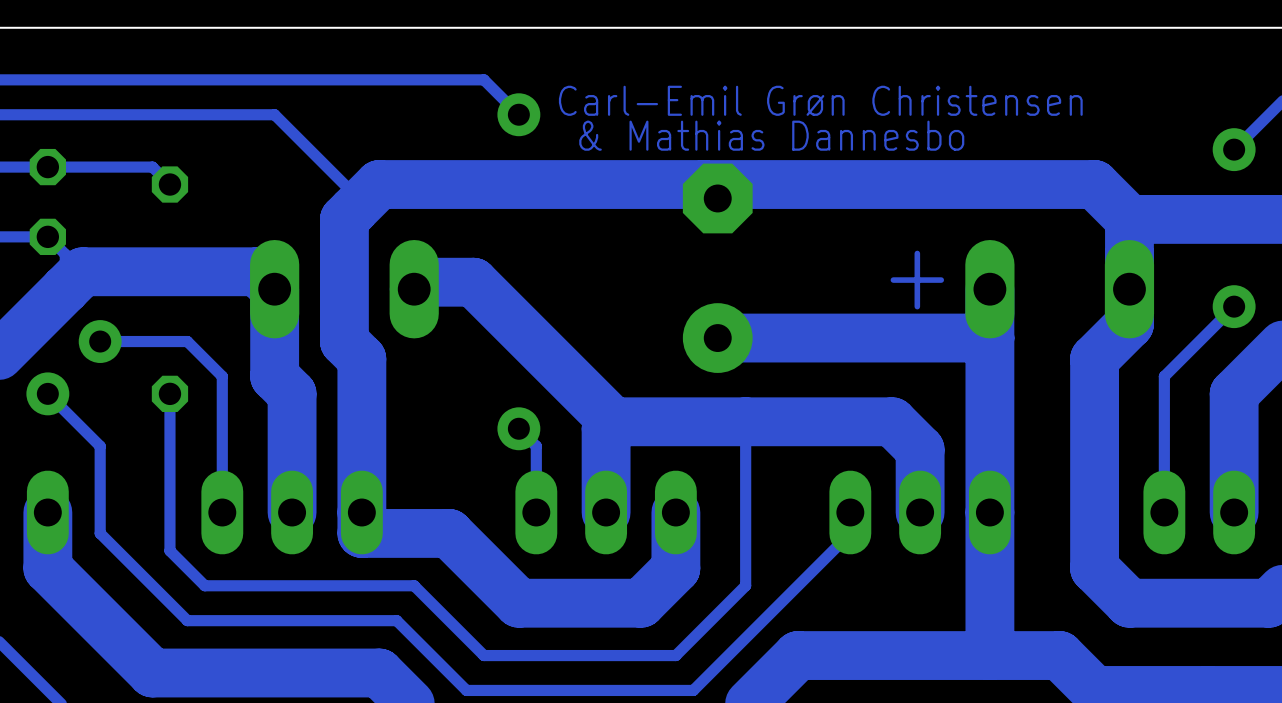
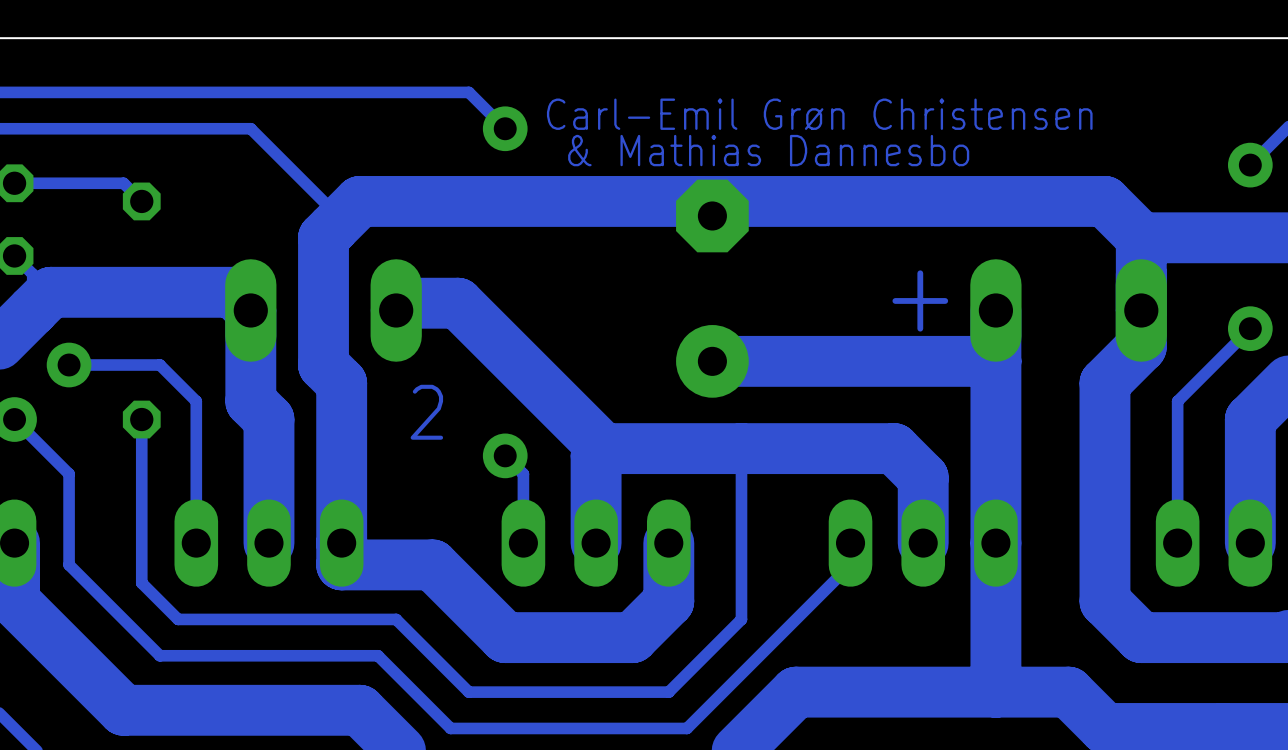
text: none -> 2 (426, 412)

